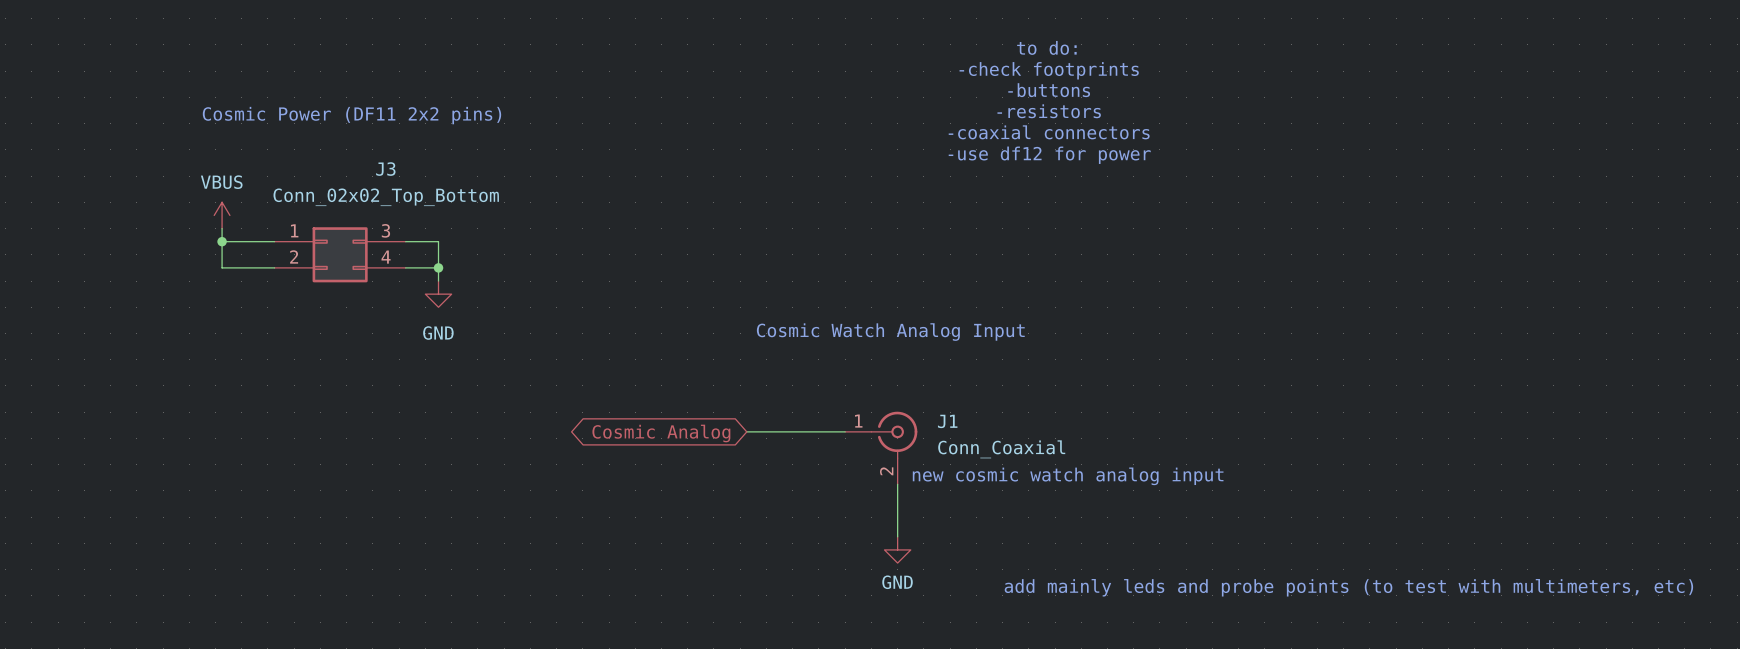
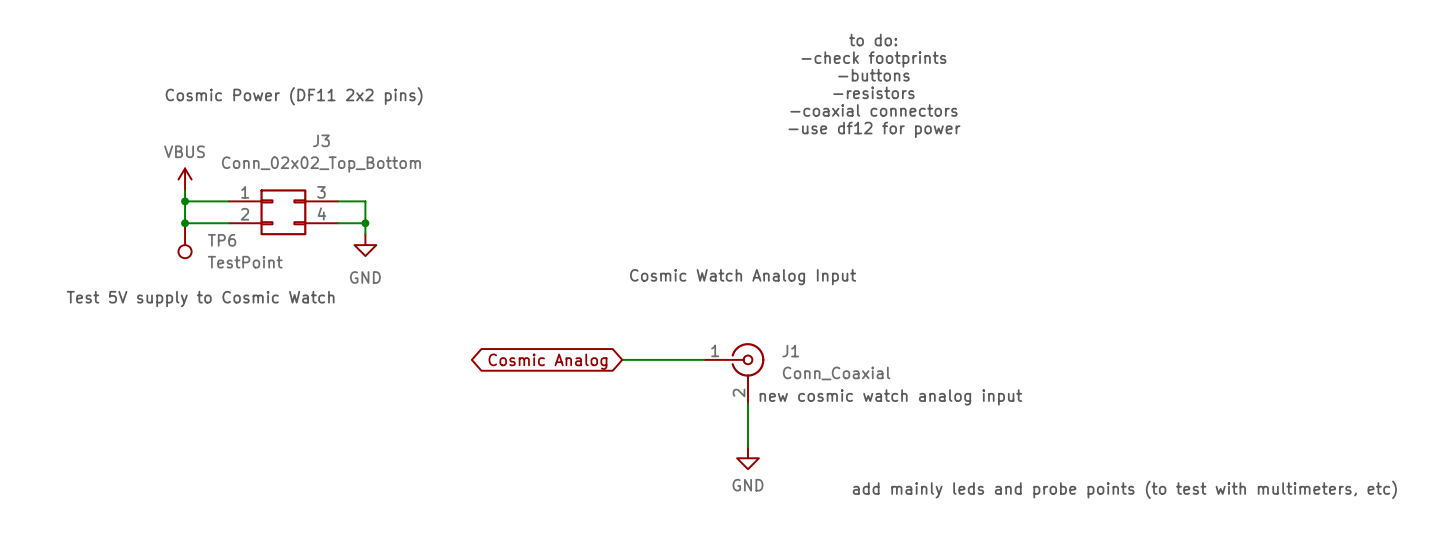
junction: none -> (185, 223)
TP6: none -> TestPoint (185, 240)
text: none -> Test 5V supply to Cosmic Watch (200, 299)

